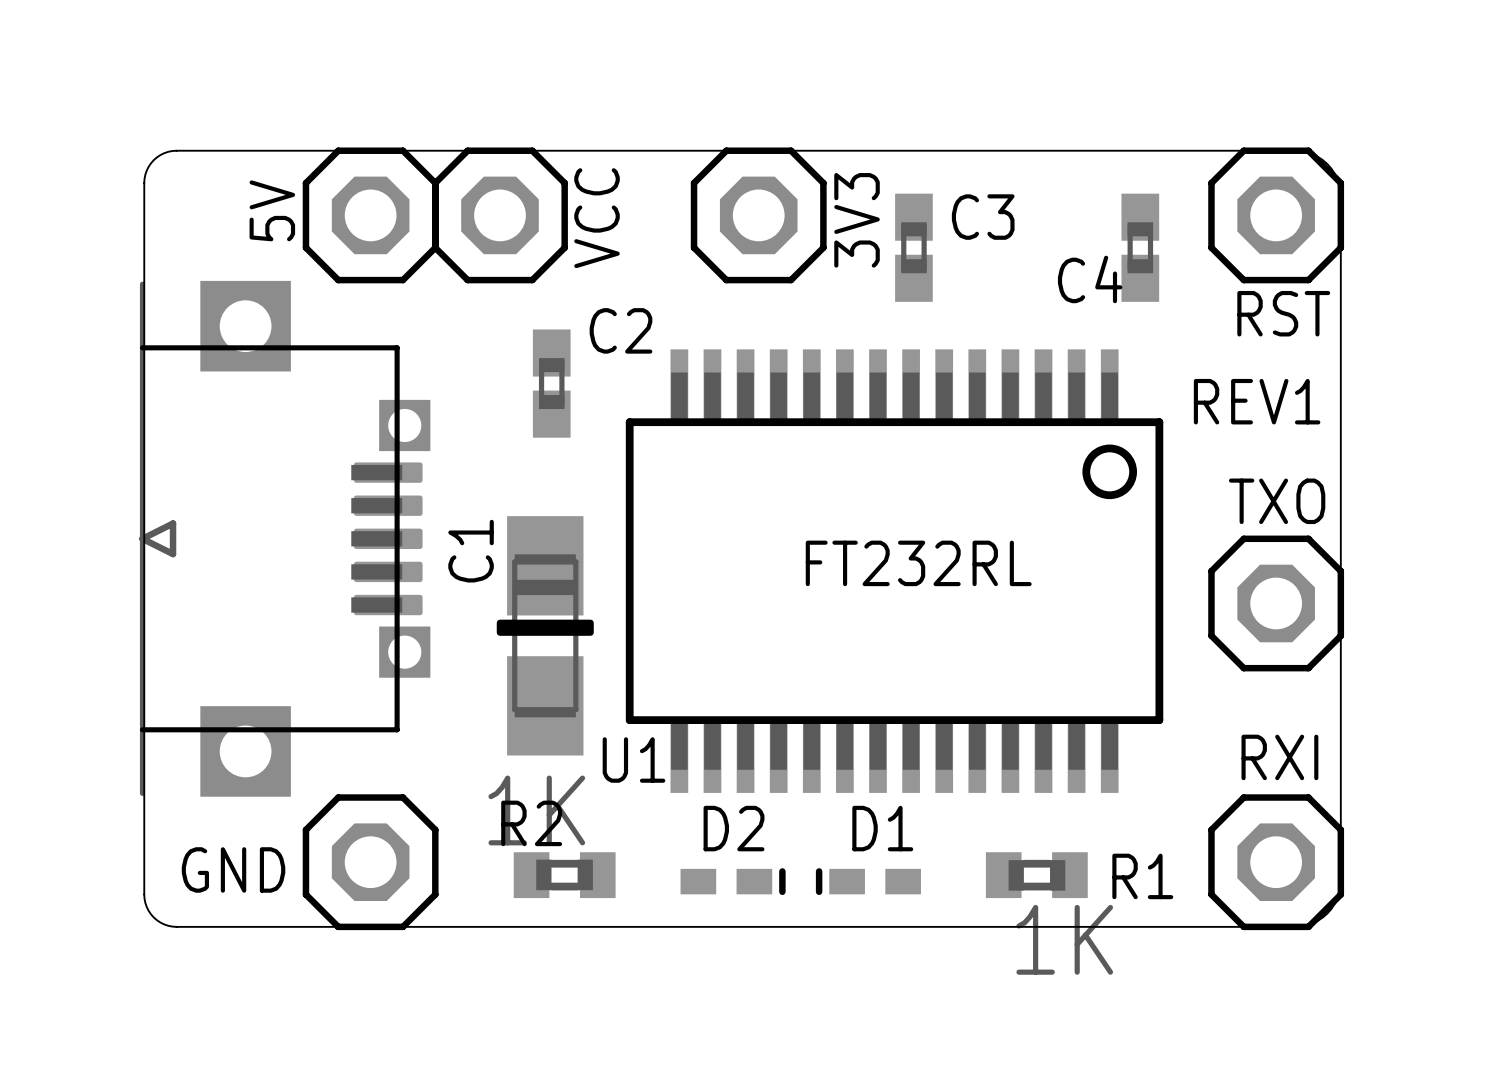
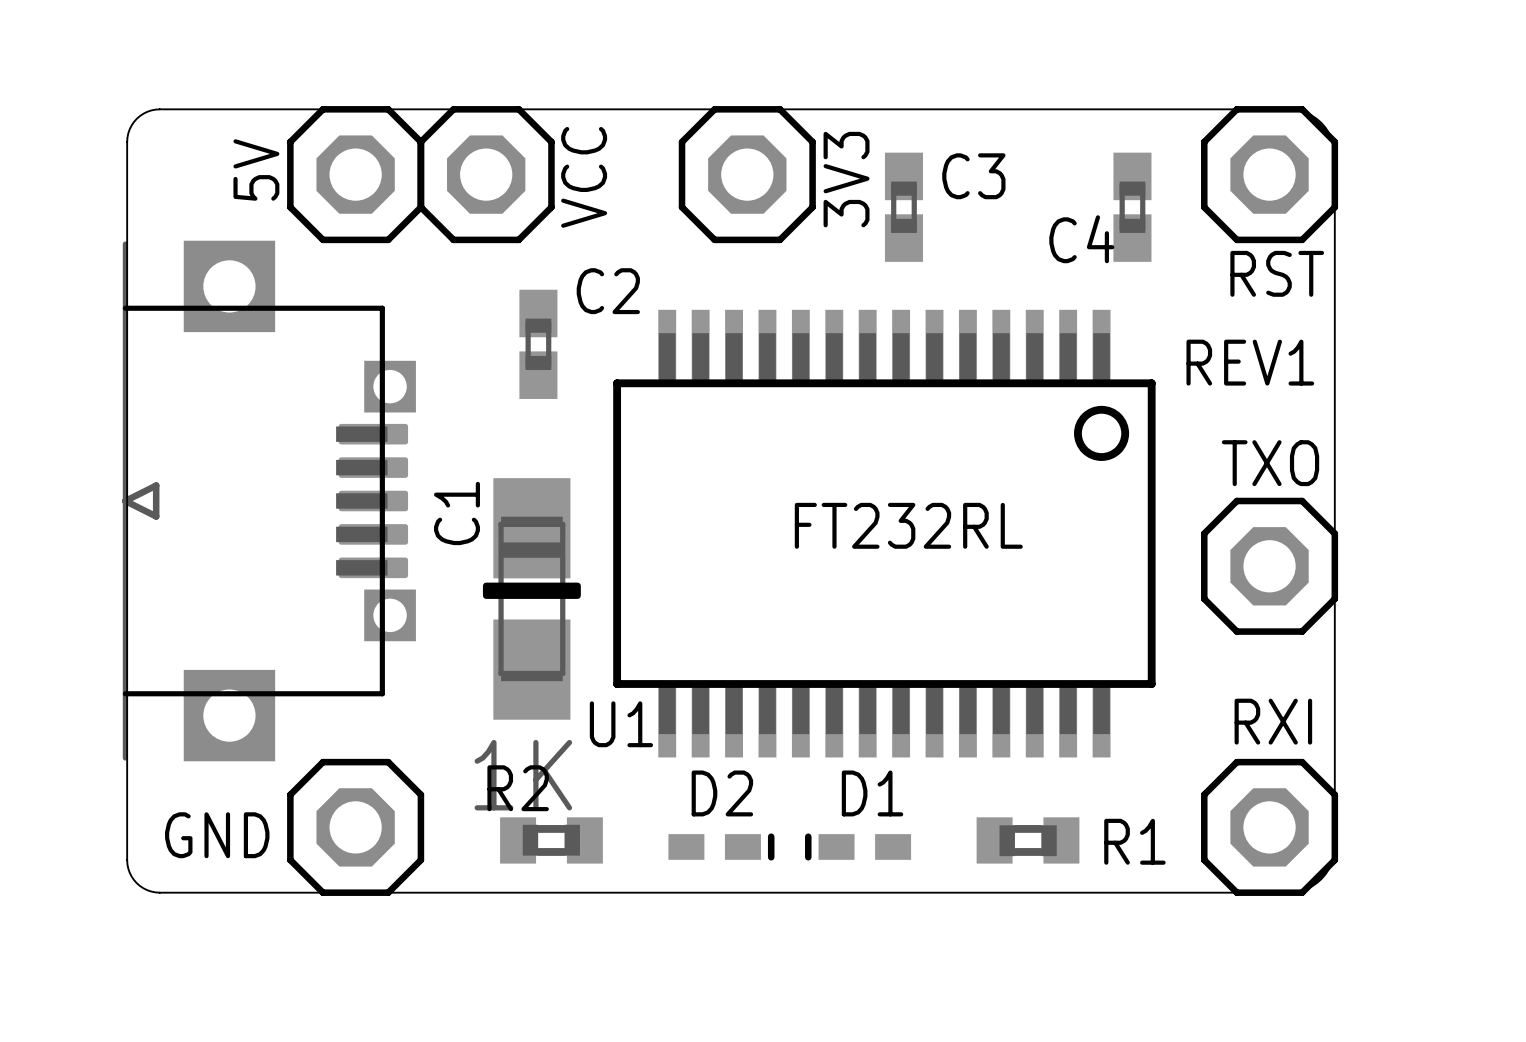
R1 value: 1K (1064, 939) -> none

